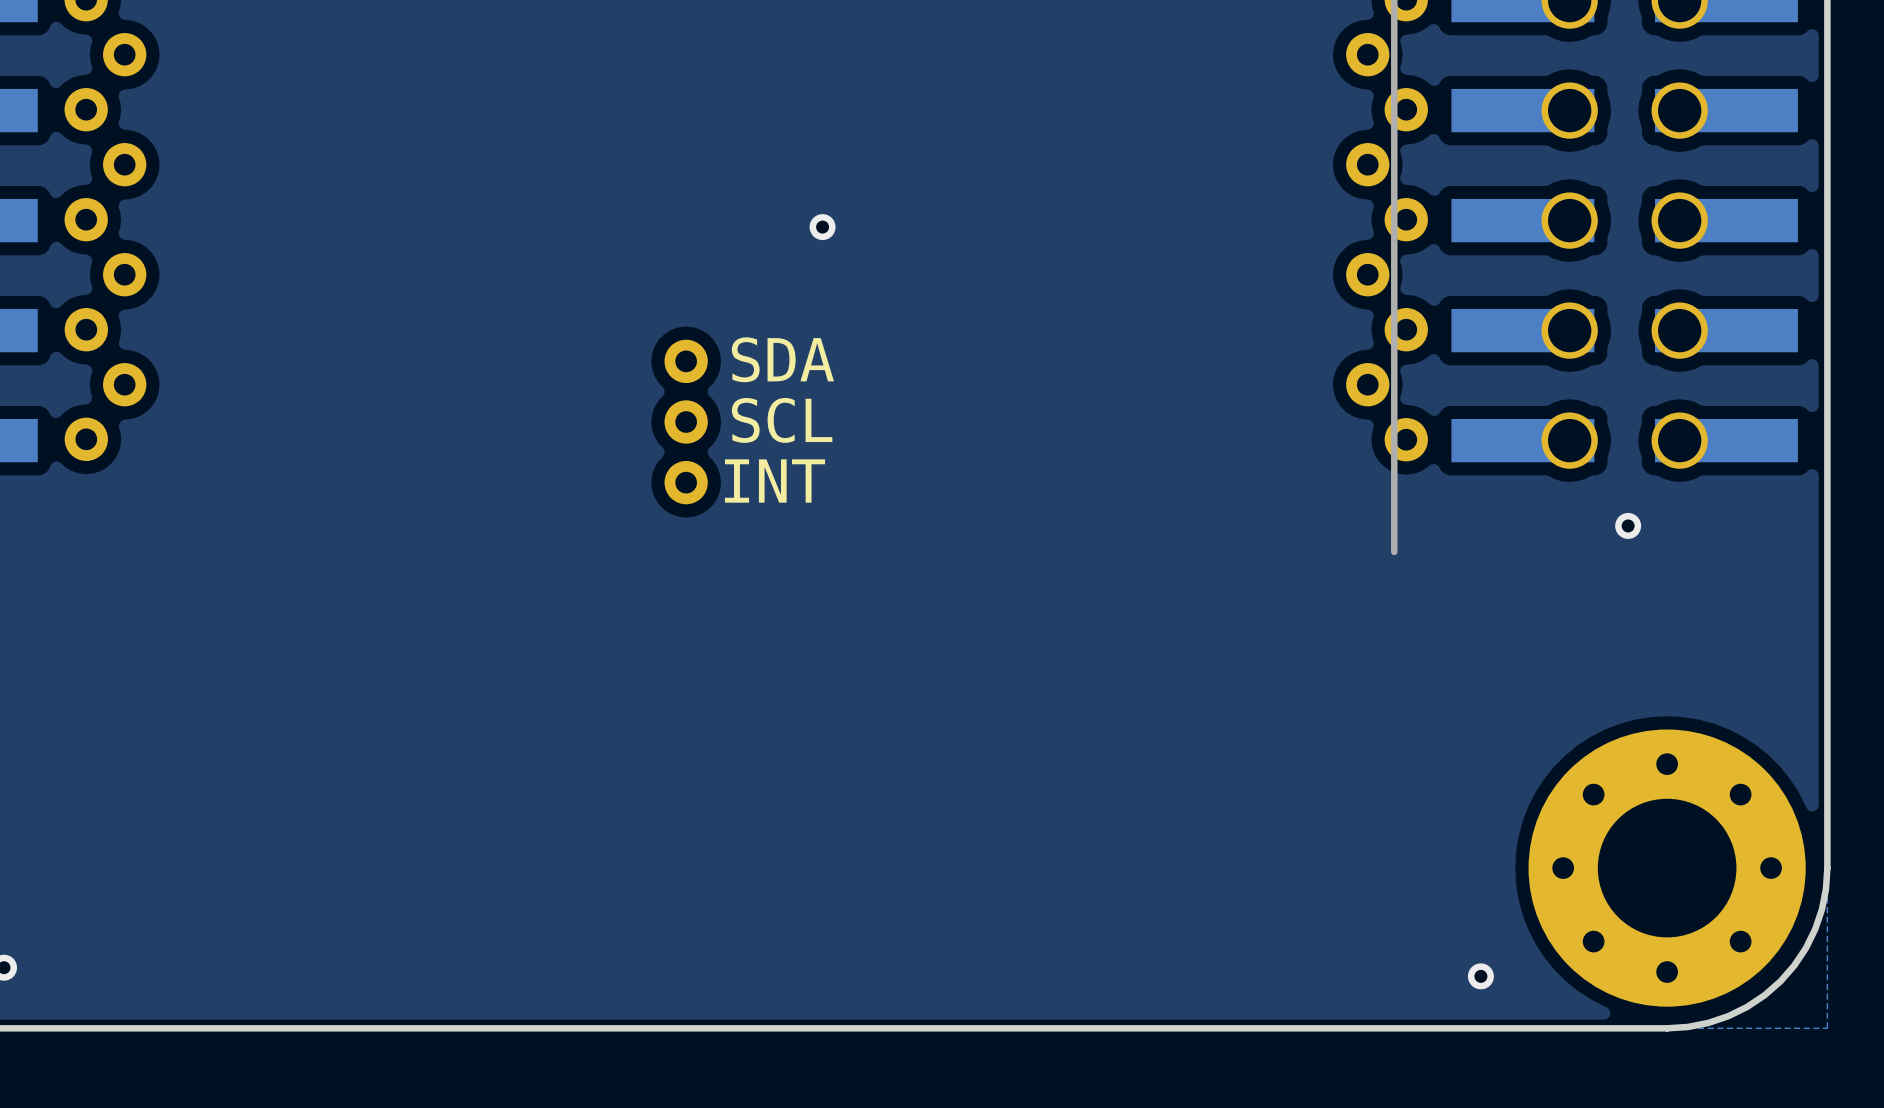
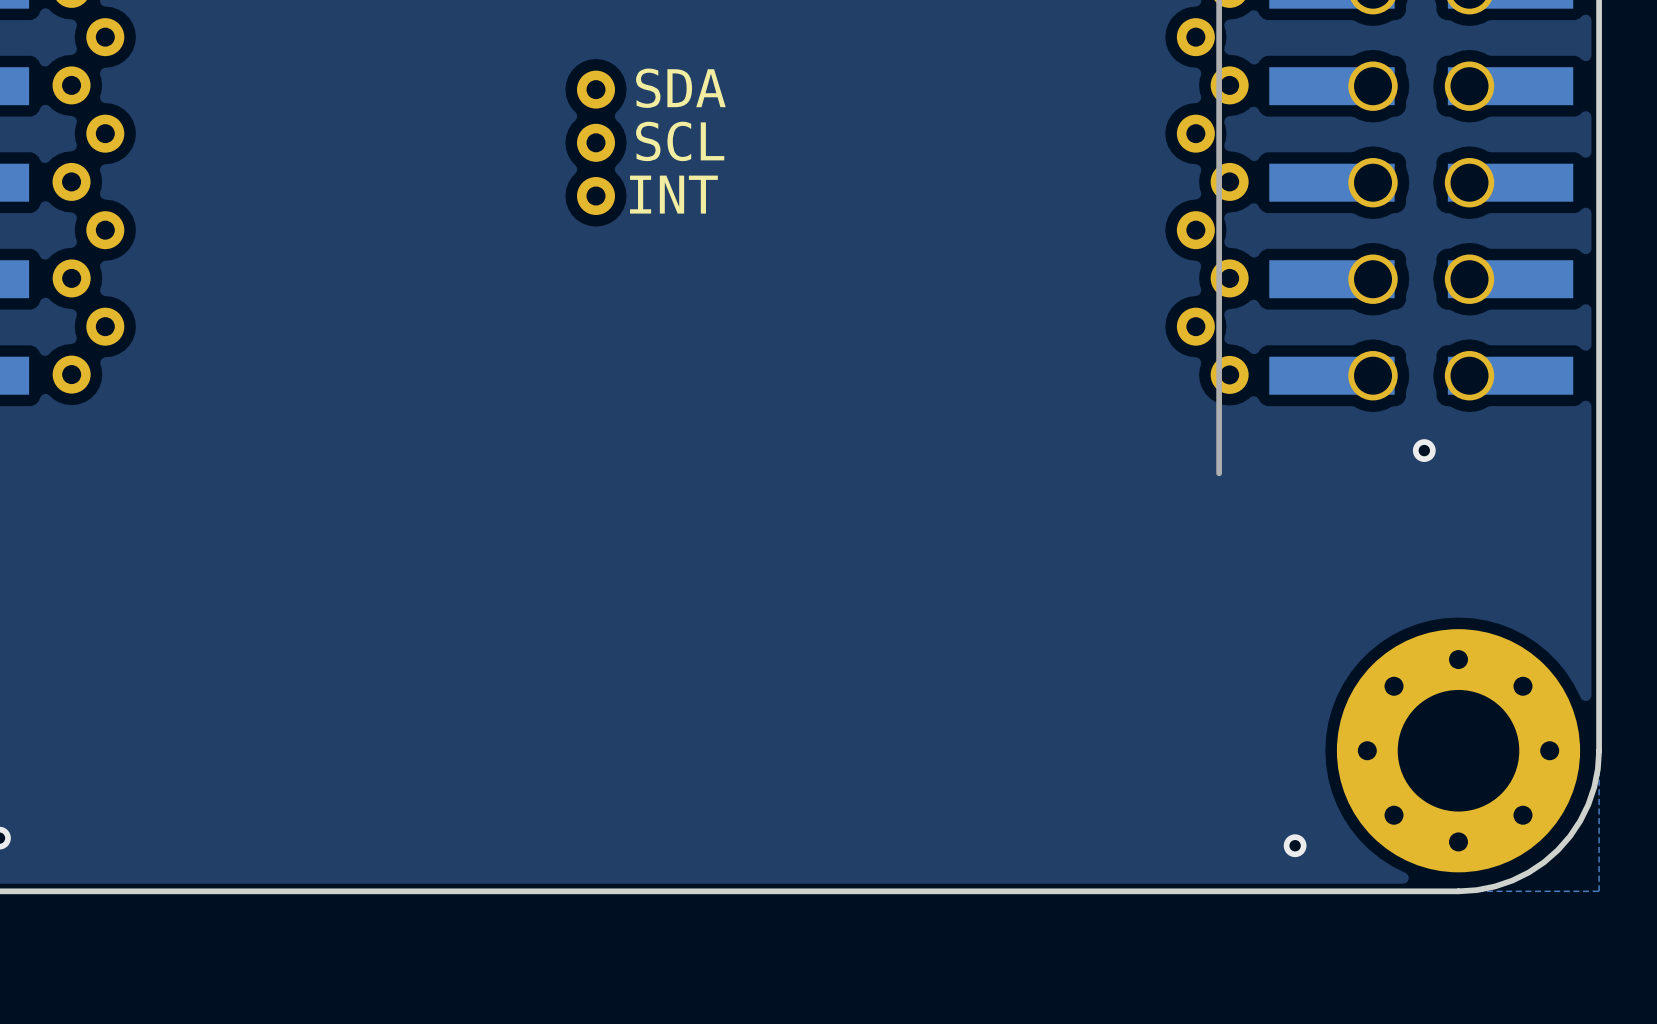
via: (822, 227) -> none
part position: (686, 361) -> (596, 89)
part position: (686, 421) -> (596, 142)
part position: (686, 482) -> (596, 196)

